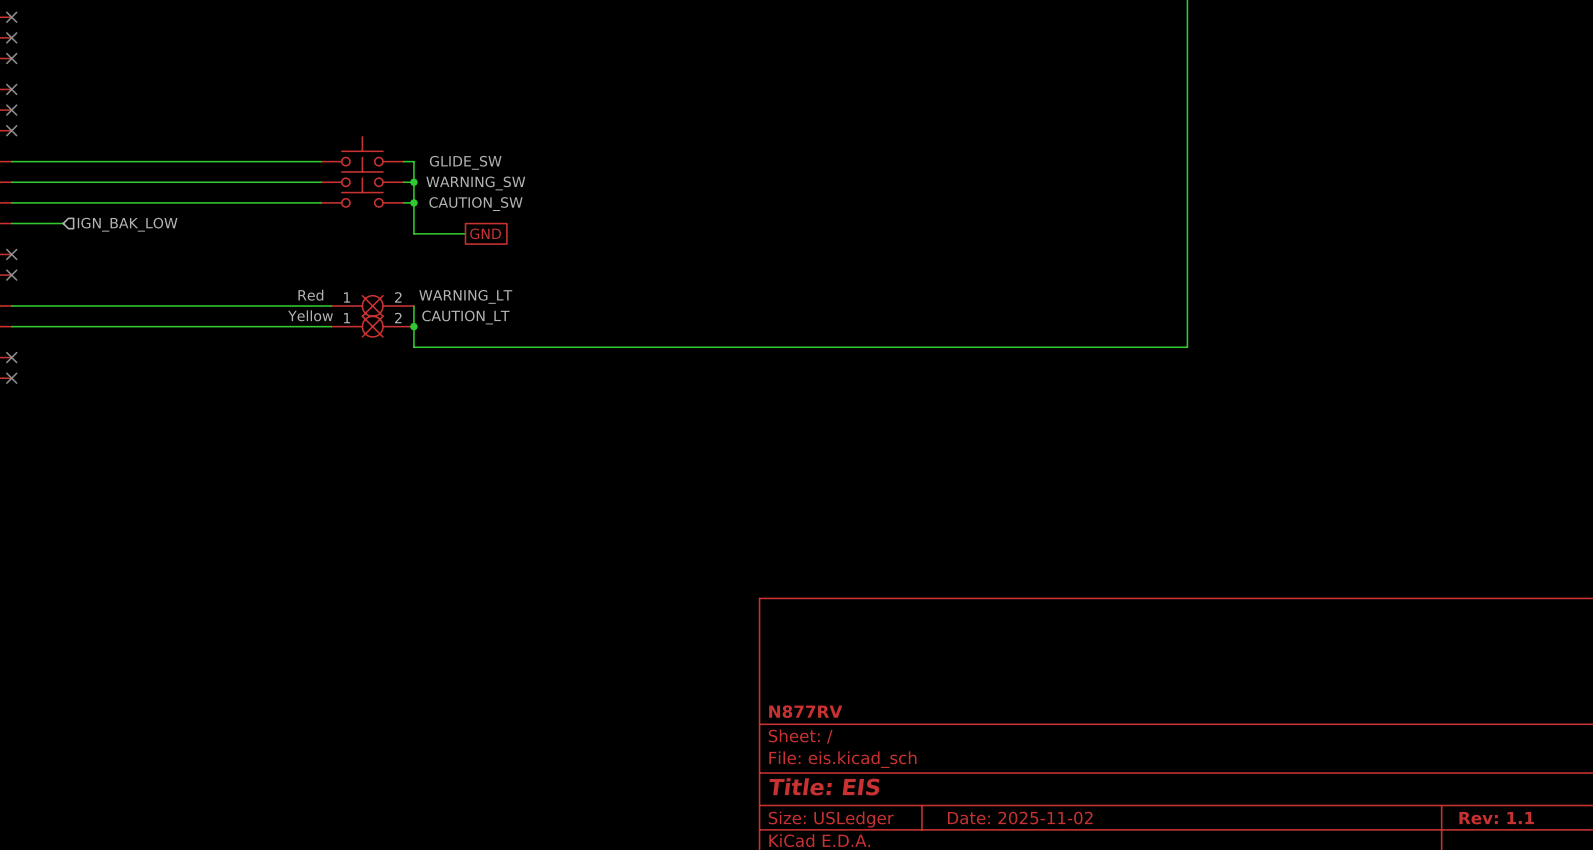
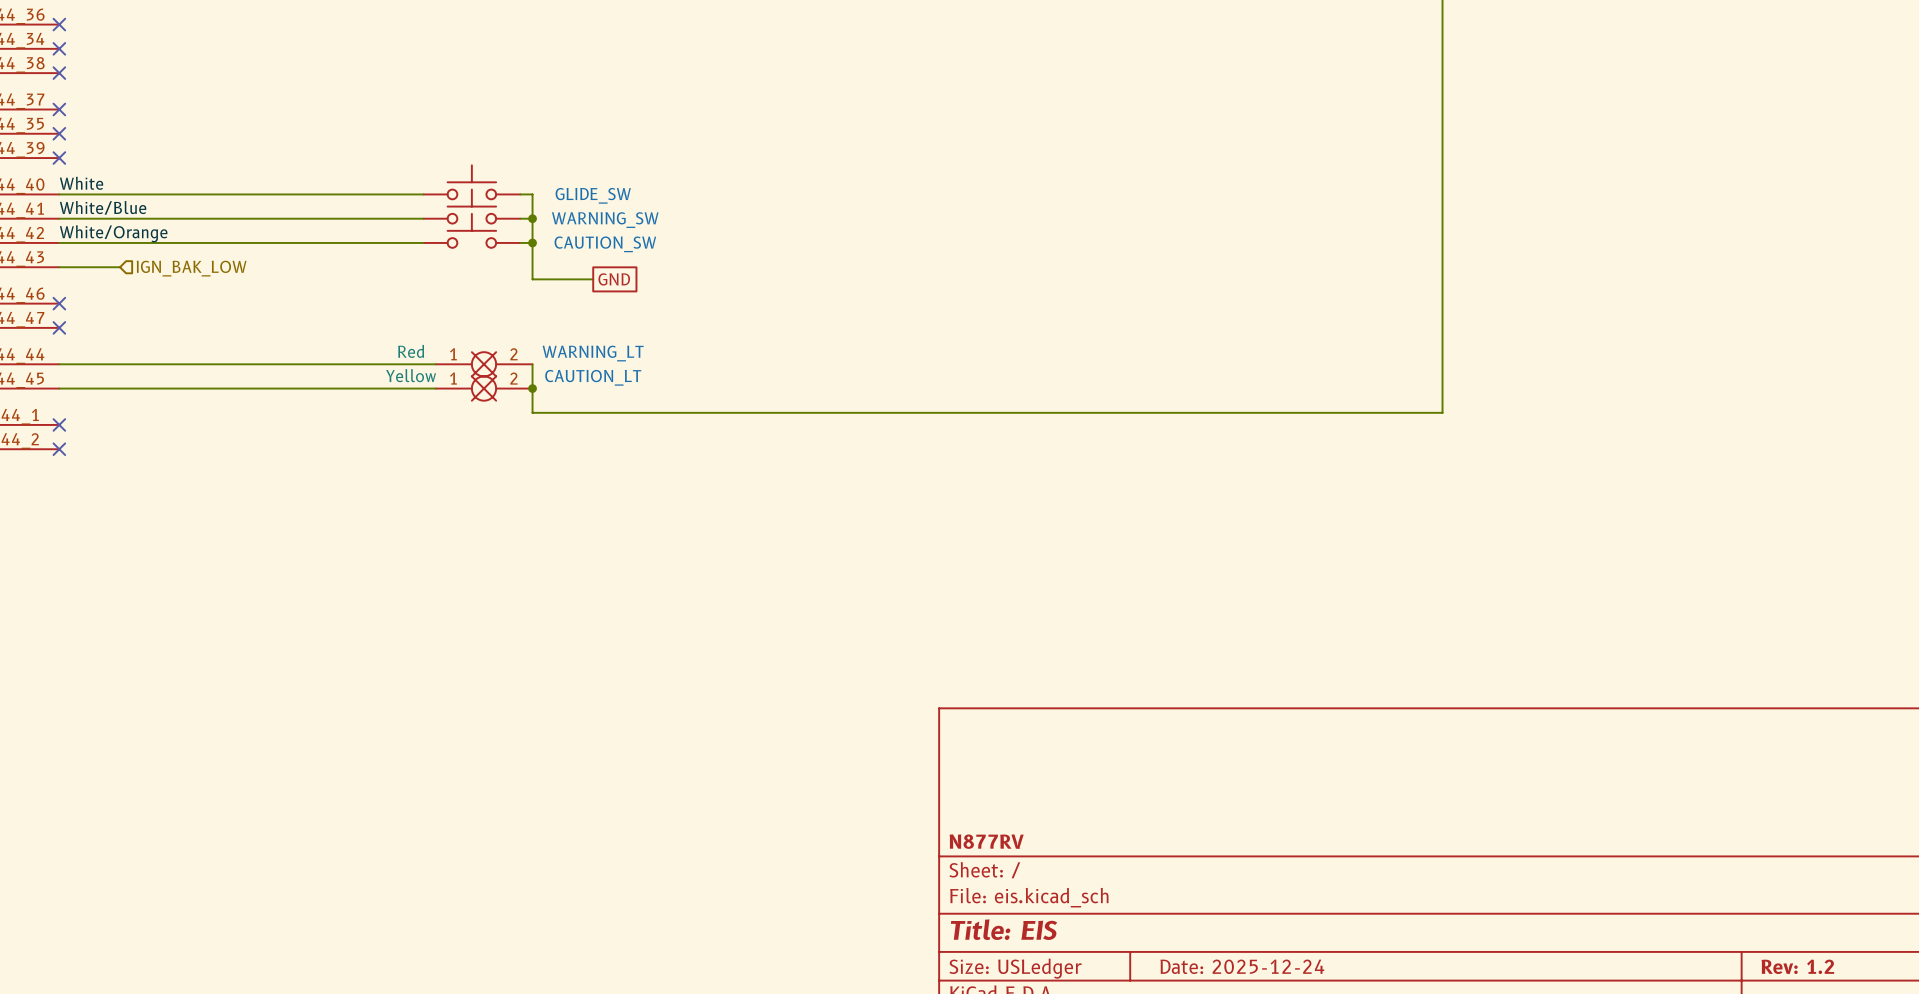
label: none -> White (81, 183)
label: none -> White/Blue (103, 207)
label: none -> White/Orange (113, 233)
title block: Date: 2025-11-02 (1020, 818) -> Date: 2025-12-24 (1242, 966)
title block: Rev: 1.1 (1496, 818) -> Rev: 1.2 (1797, 966)

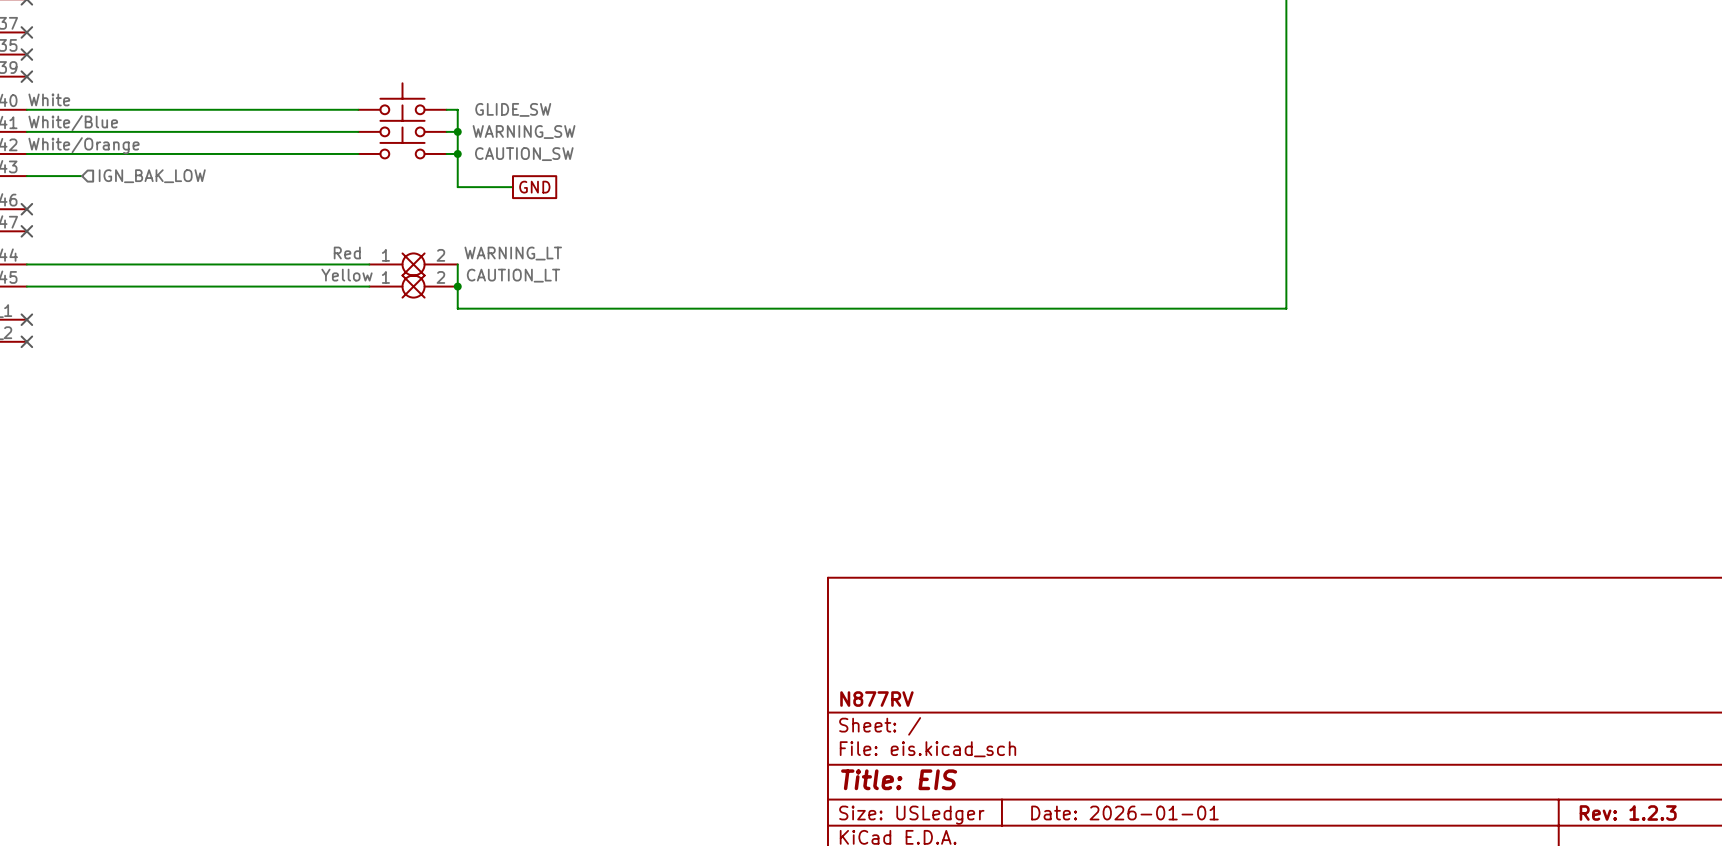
title block: Date: 2025-12-24 (1242, 966) -> Date: 2026-01-01 (1124, 813)
title block: Rev: 1.2 (1797, 966) -> Rev: 1.2.3 (1628, 813)

